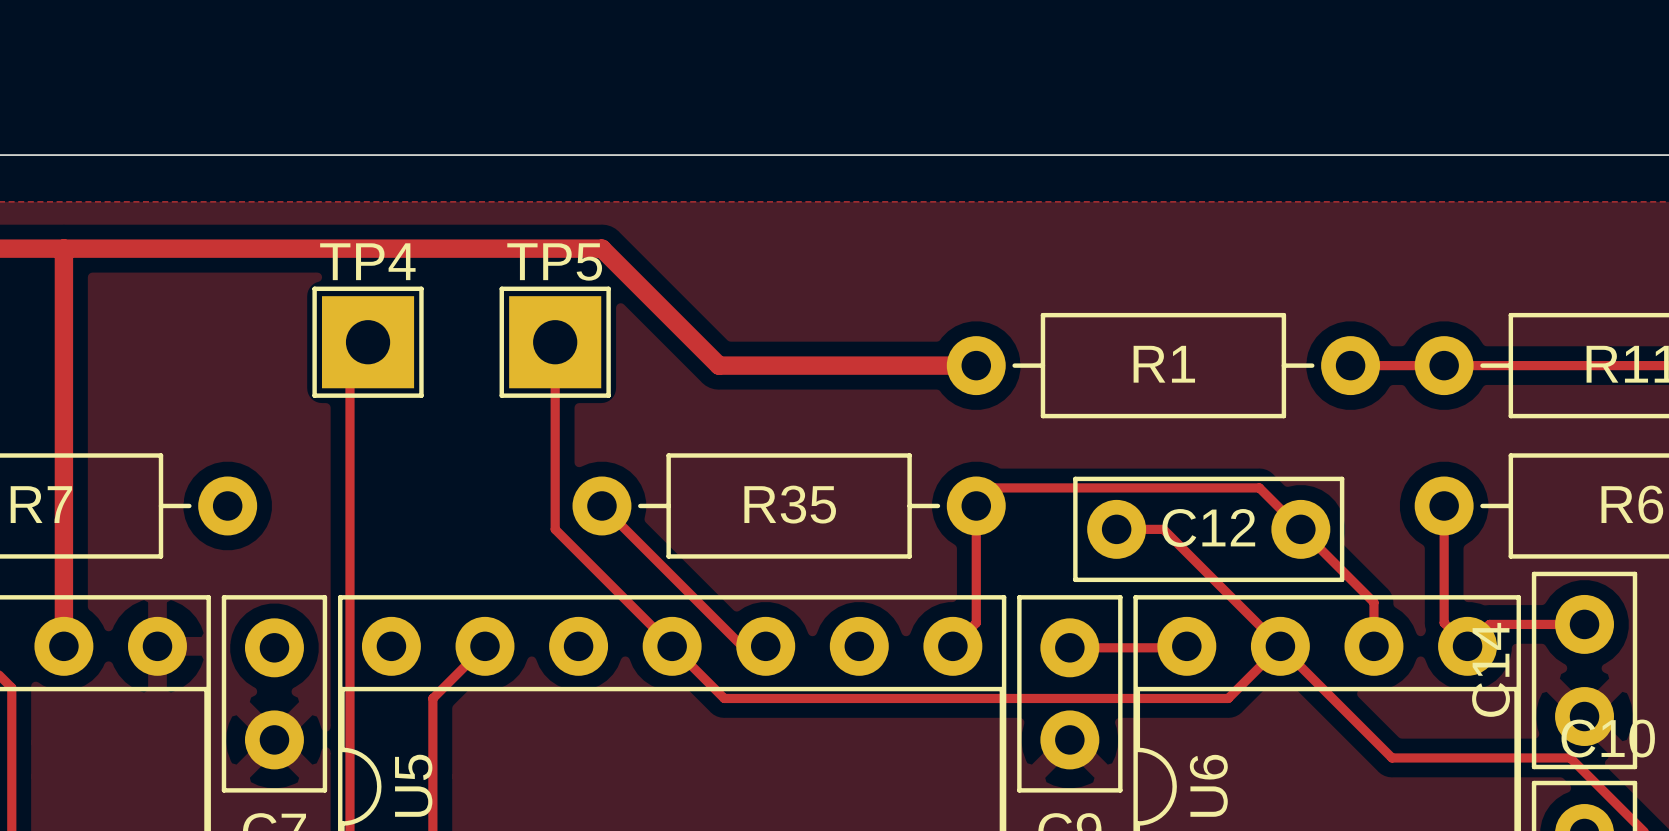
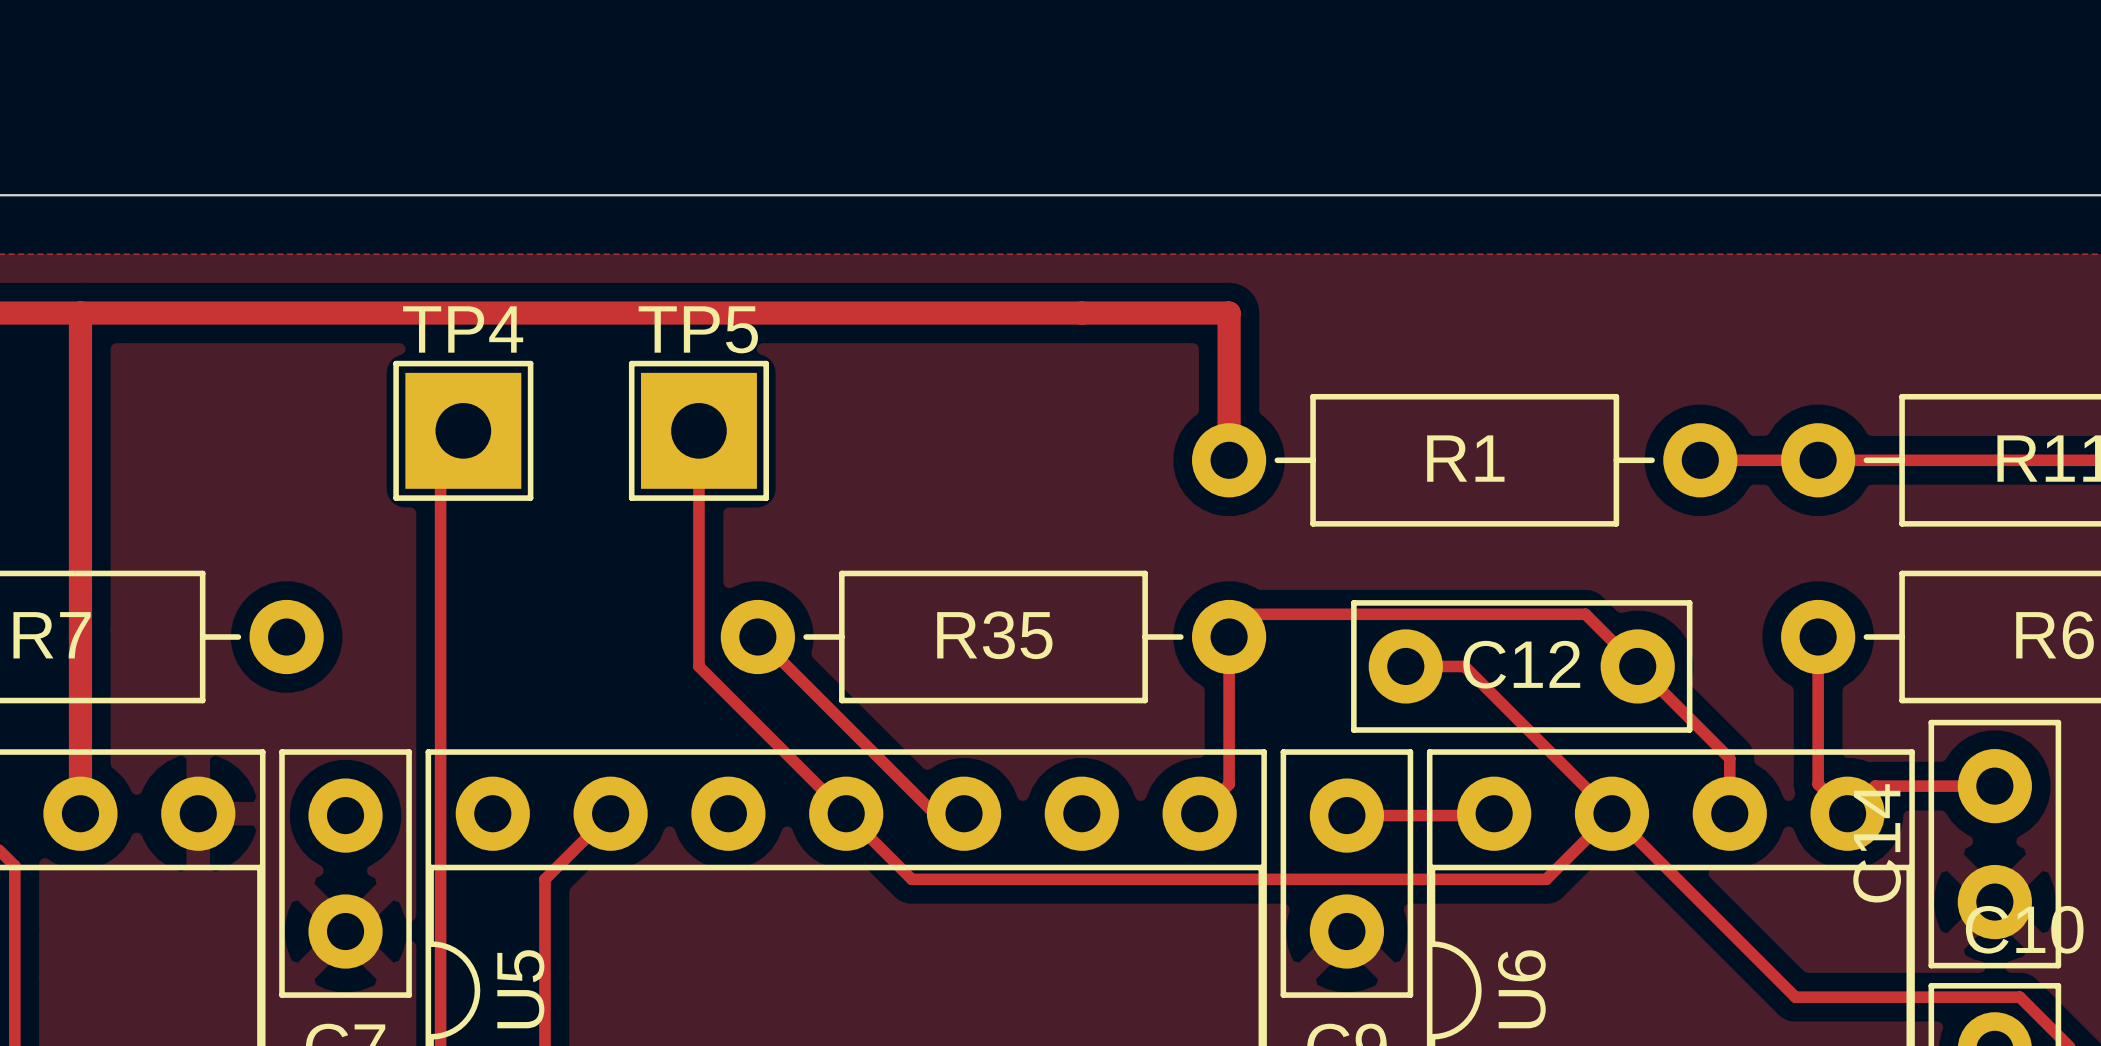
track: (601, 248) (718, 365) (976, 365) -> (757, 313) (1229, 313) (1229, 460)
track: (1392, 757) (1570, 757) (1604, 792) -> (1752, 954) (1795, 997) (2019, 997)

